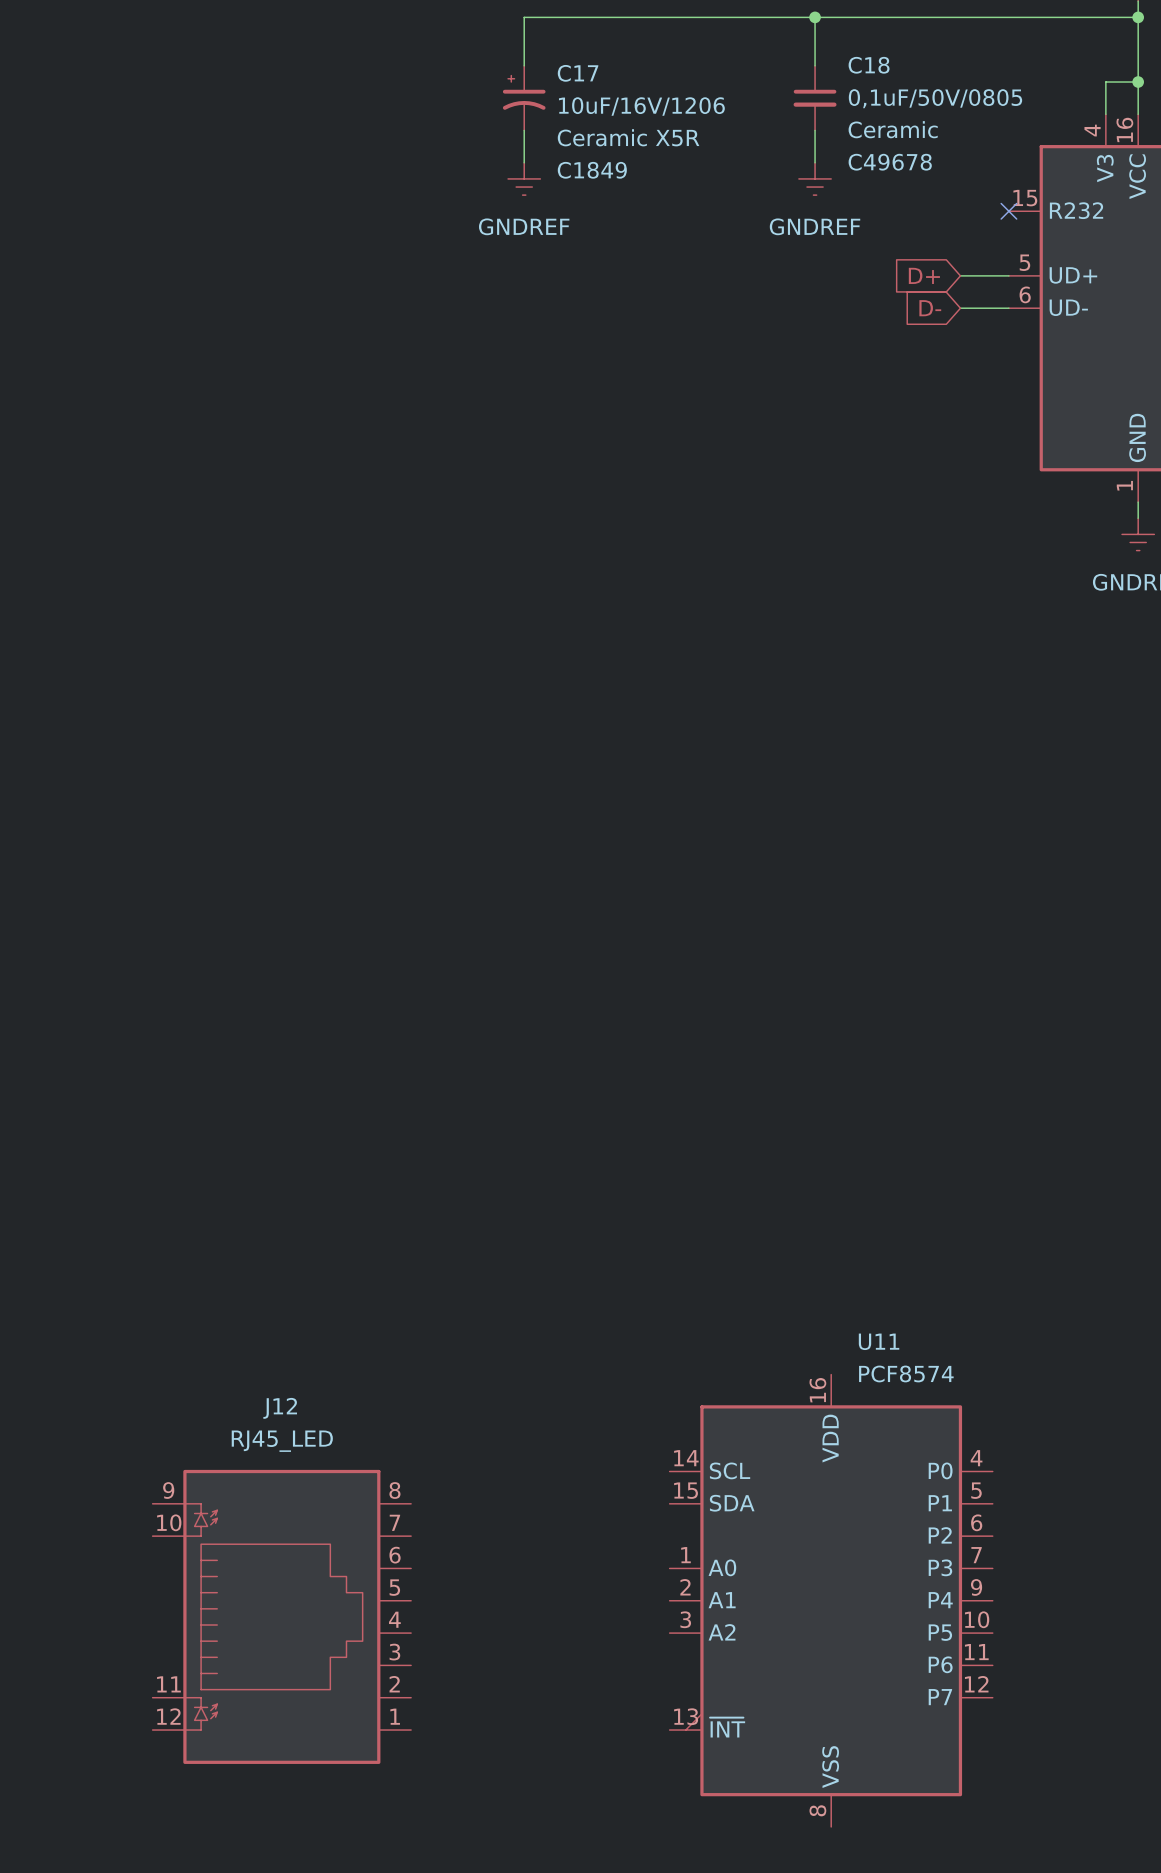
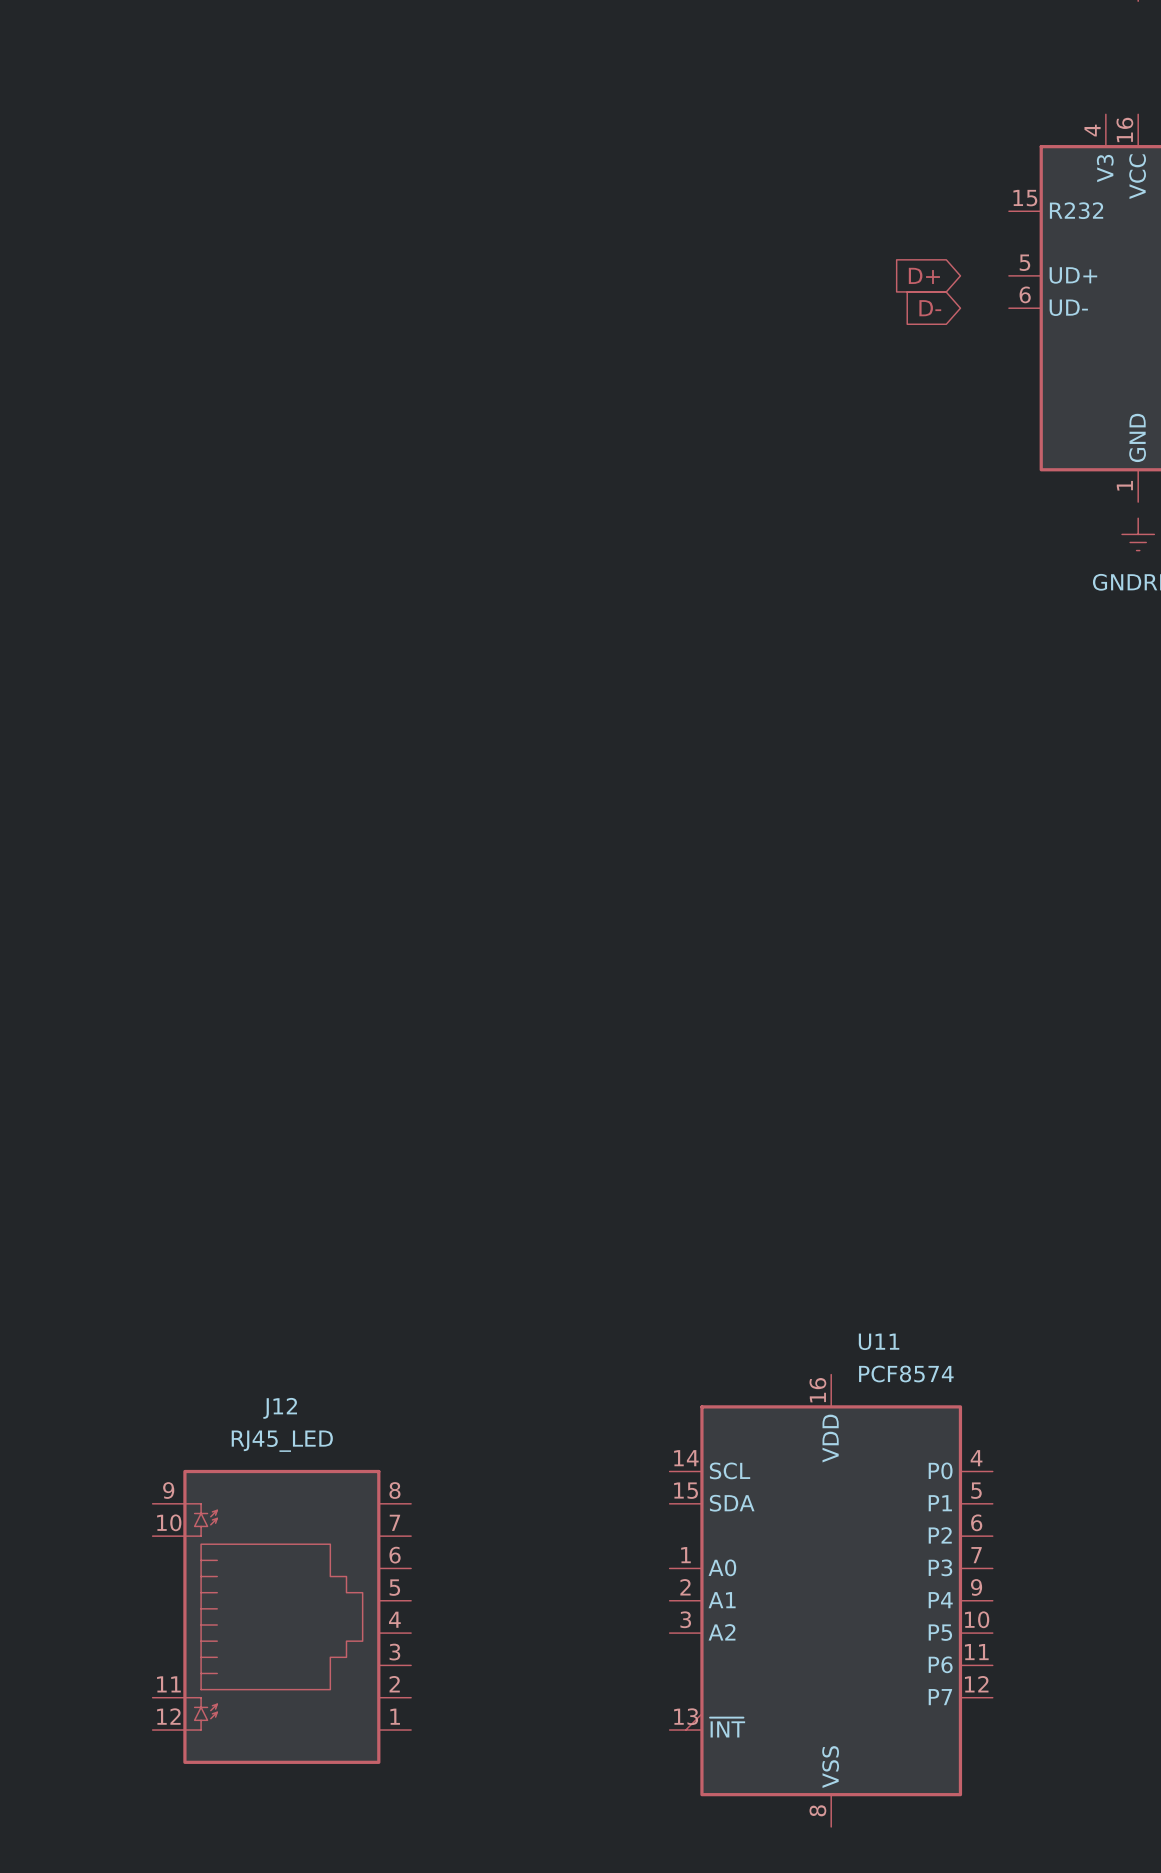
wire: (1138, 1) (1138, 114) -> none
wire: (815, 17) (815, 65) -> none
junction: (815, 17) -> none
wire: (1138, 17) (524, 17) (524, 65) -> none
junction: (1138, 17) -> none
wire: (1138, 82) (1105, 82) (1105, 114) -> none
junction: (1138, 82) -> none
C17: 10uF/16V/1206 (524, 98) -> none
C18: 0,1uF/50V/0805 (815, 98) -> none
wire: (524, 130) (524, 162) -> none
wire: (815, 130) (815, 162) -> none
power symbol: GNDREF (524, 178) -> none
power symbol: GNDREF (815, 178) -> none
no-connect mark: (1008, 211) -> none
wire: (960, 275) (1008, 275) -> none
wire: (960, 308) (1008, 308) -> none
wire: (1138, 502) (1138, 518) -> none

